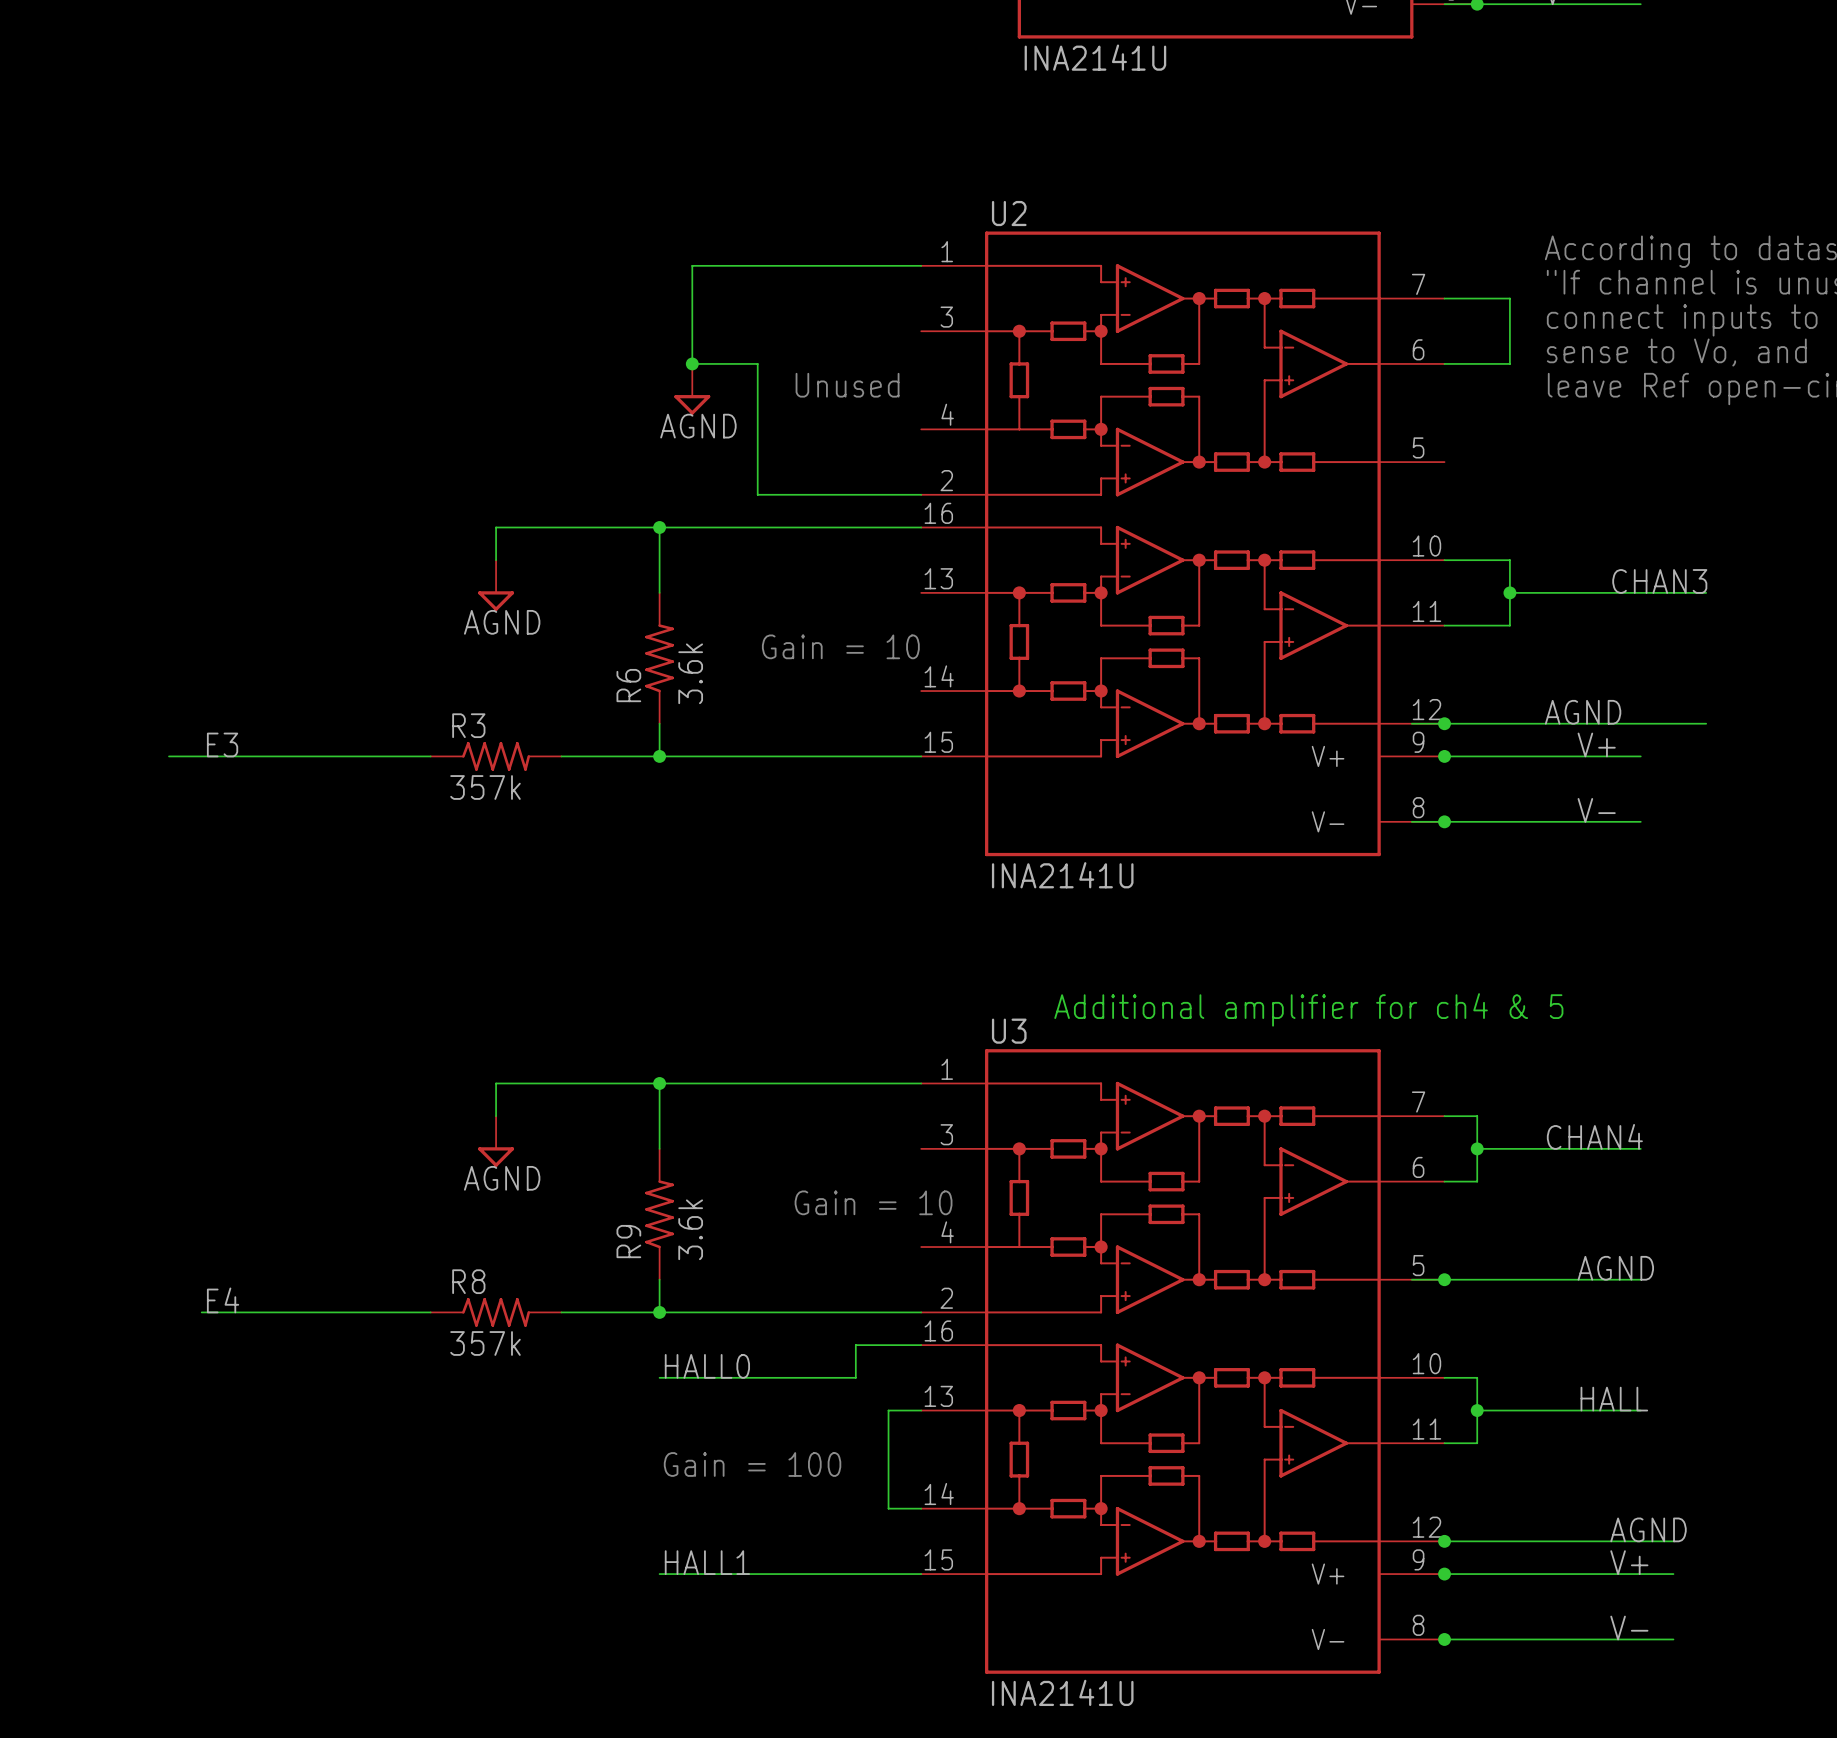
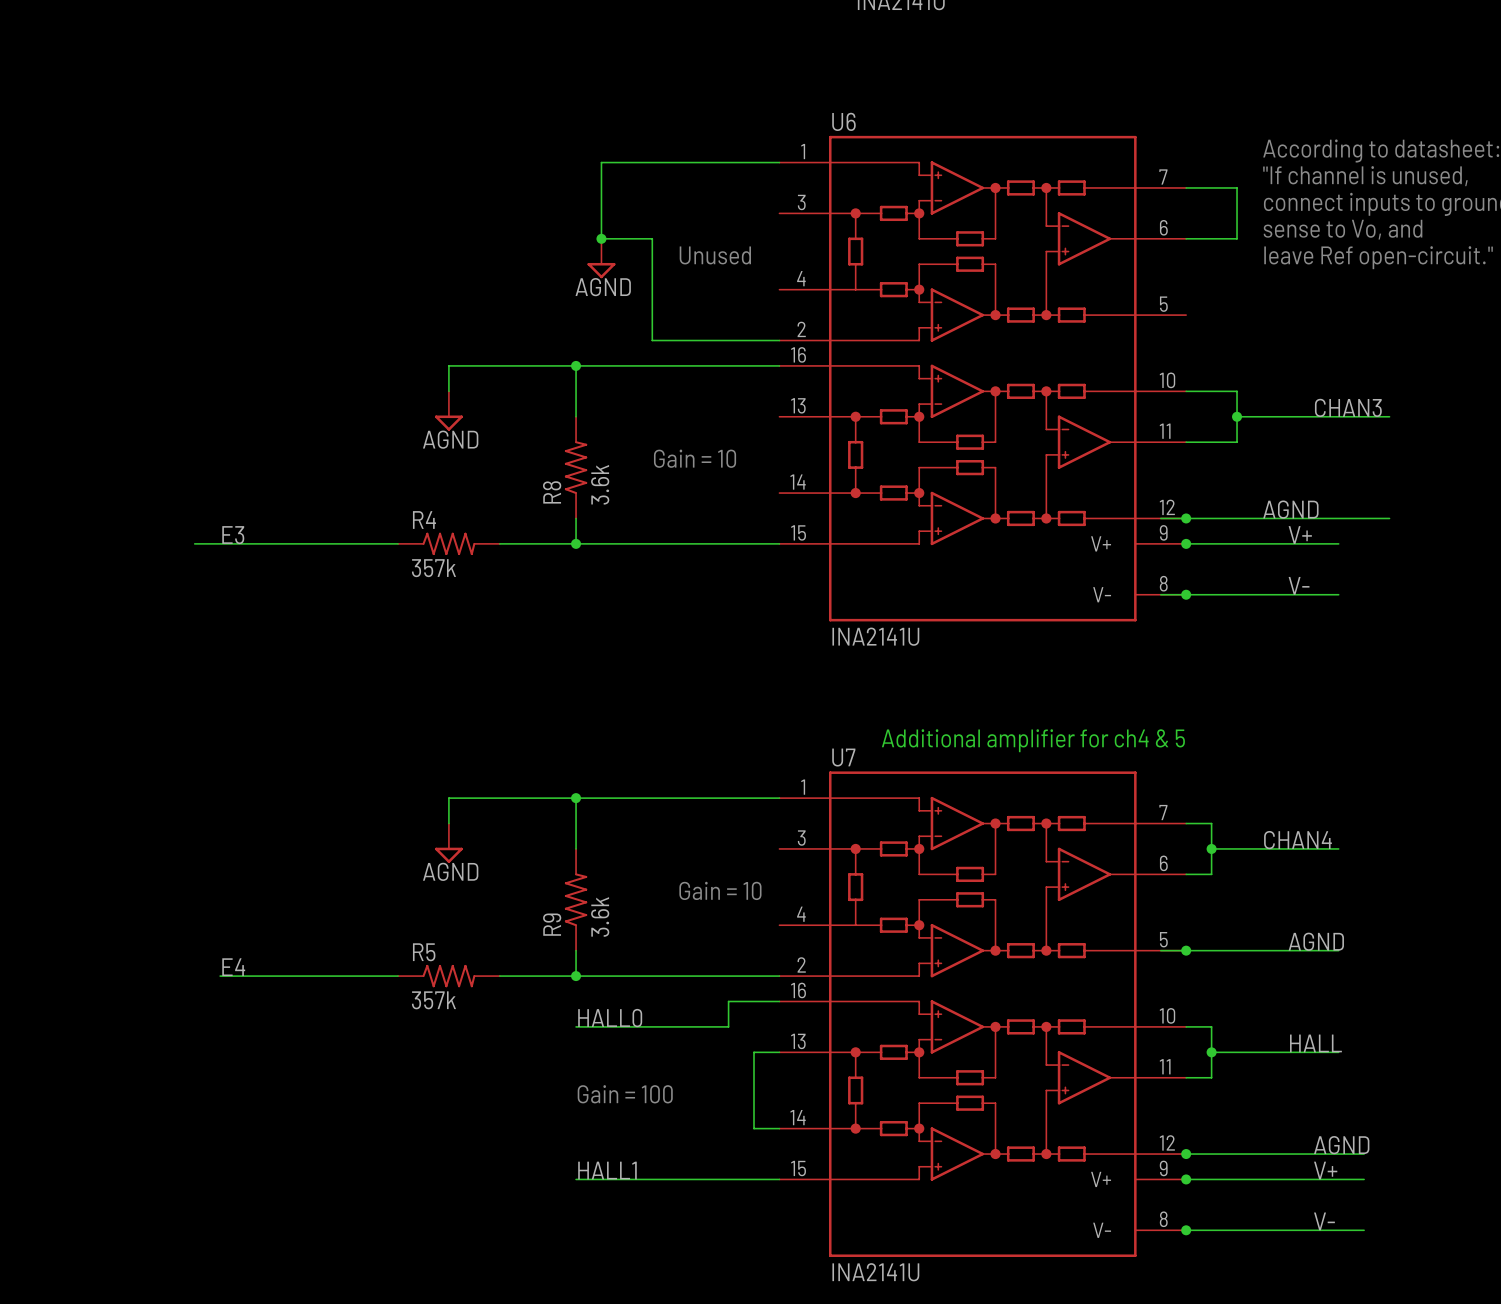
U2 name: U2 (1009, 213) -> U6 (843, 121)
R6 name: R6 (628, 685) -> R8 (552, 492)
R3 name: R3 (468, 725) -> R4 (424, 519)
U3 name: U3 (1009, 1031) -> U7 (843, 757)
R8 name: R8 (468, 1281) -> R5 (424, 952)

